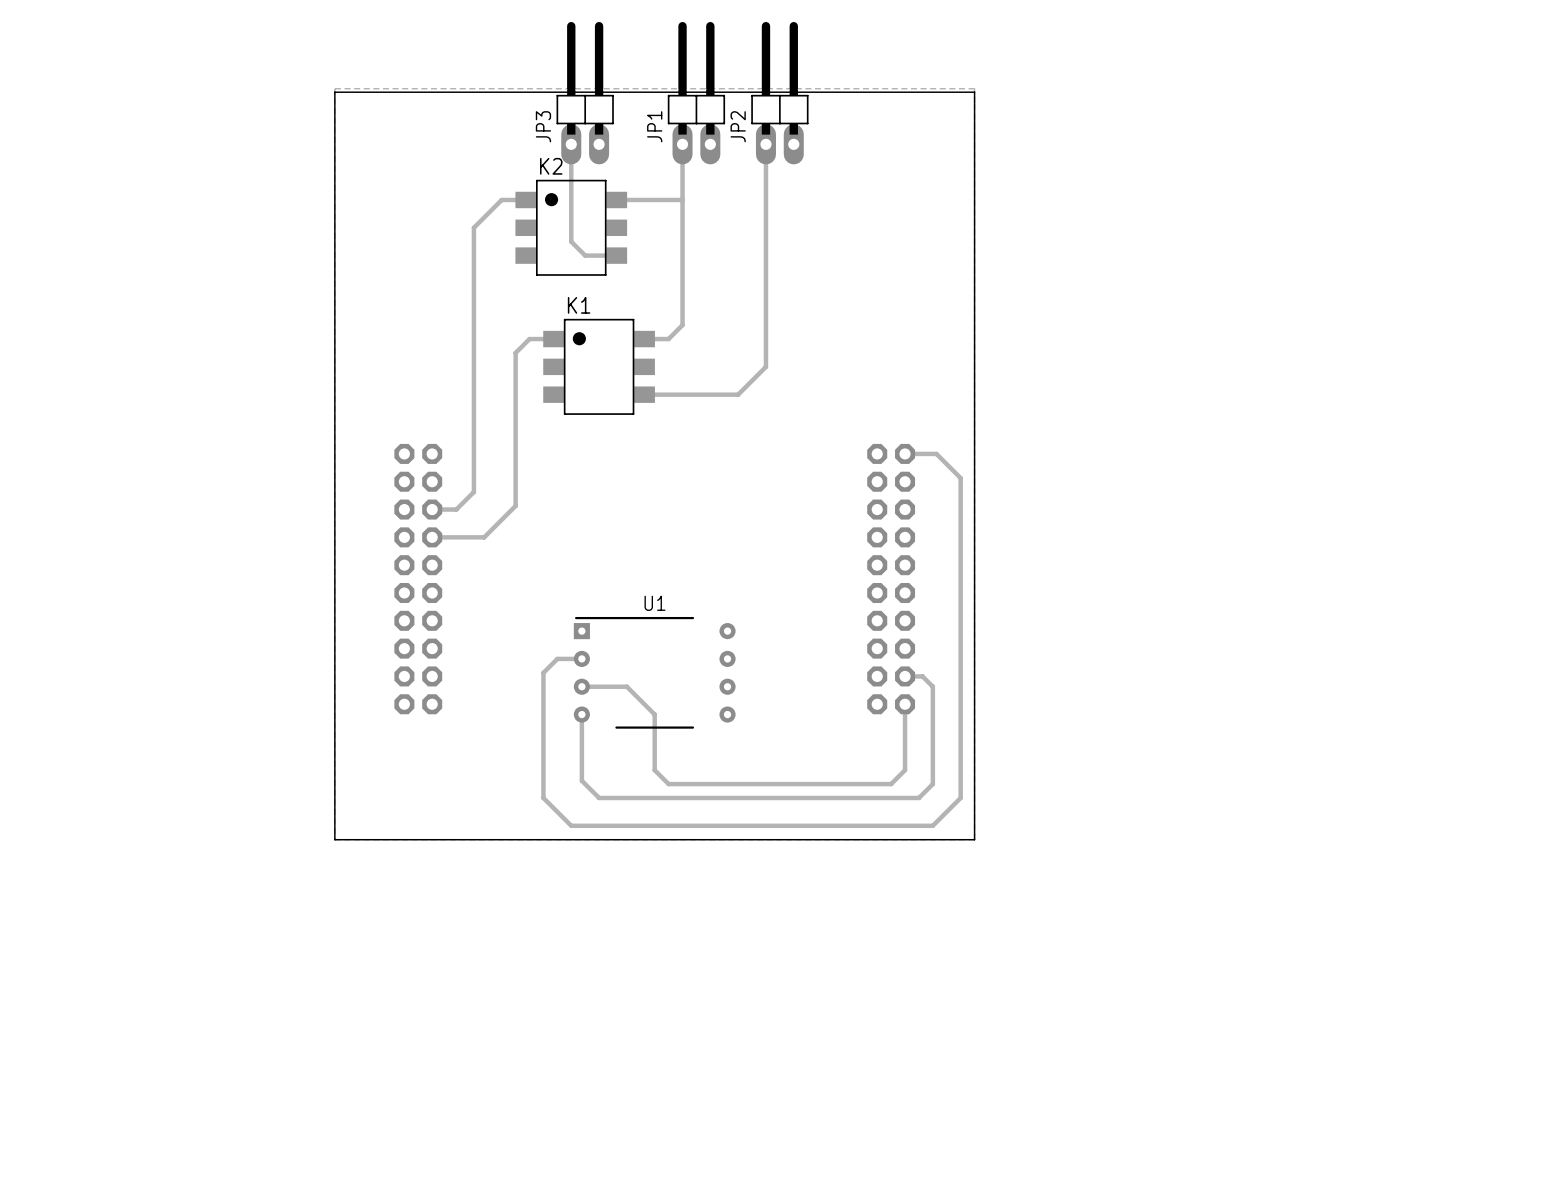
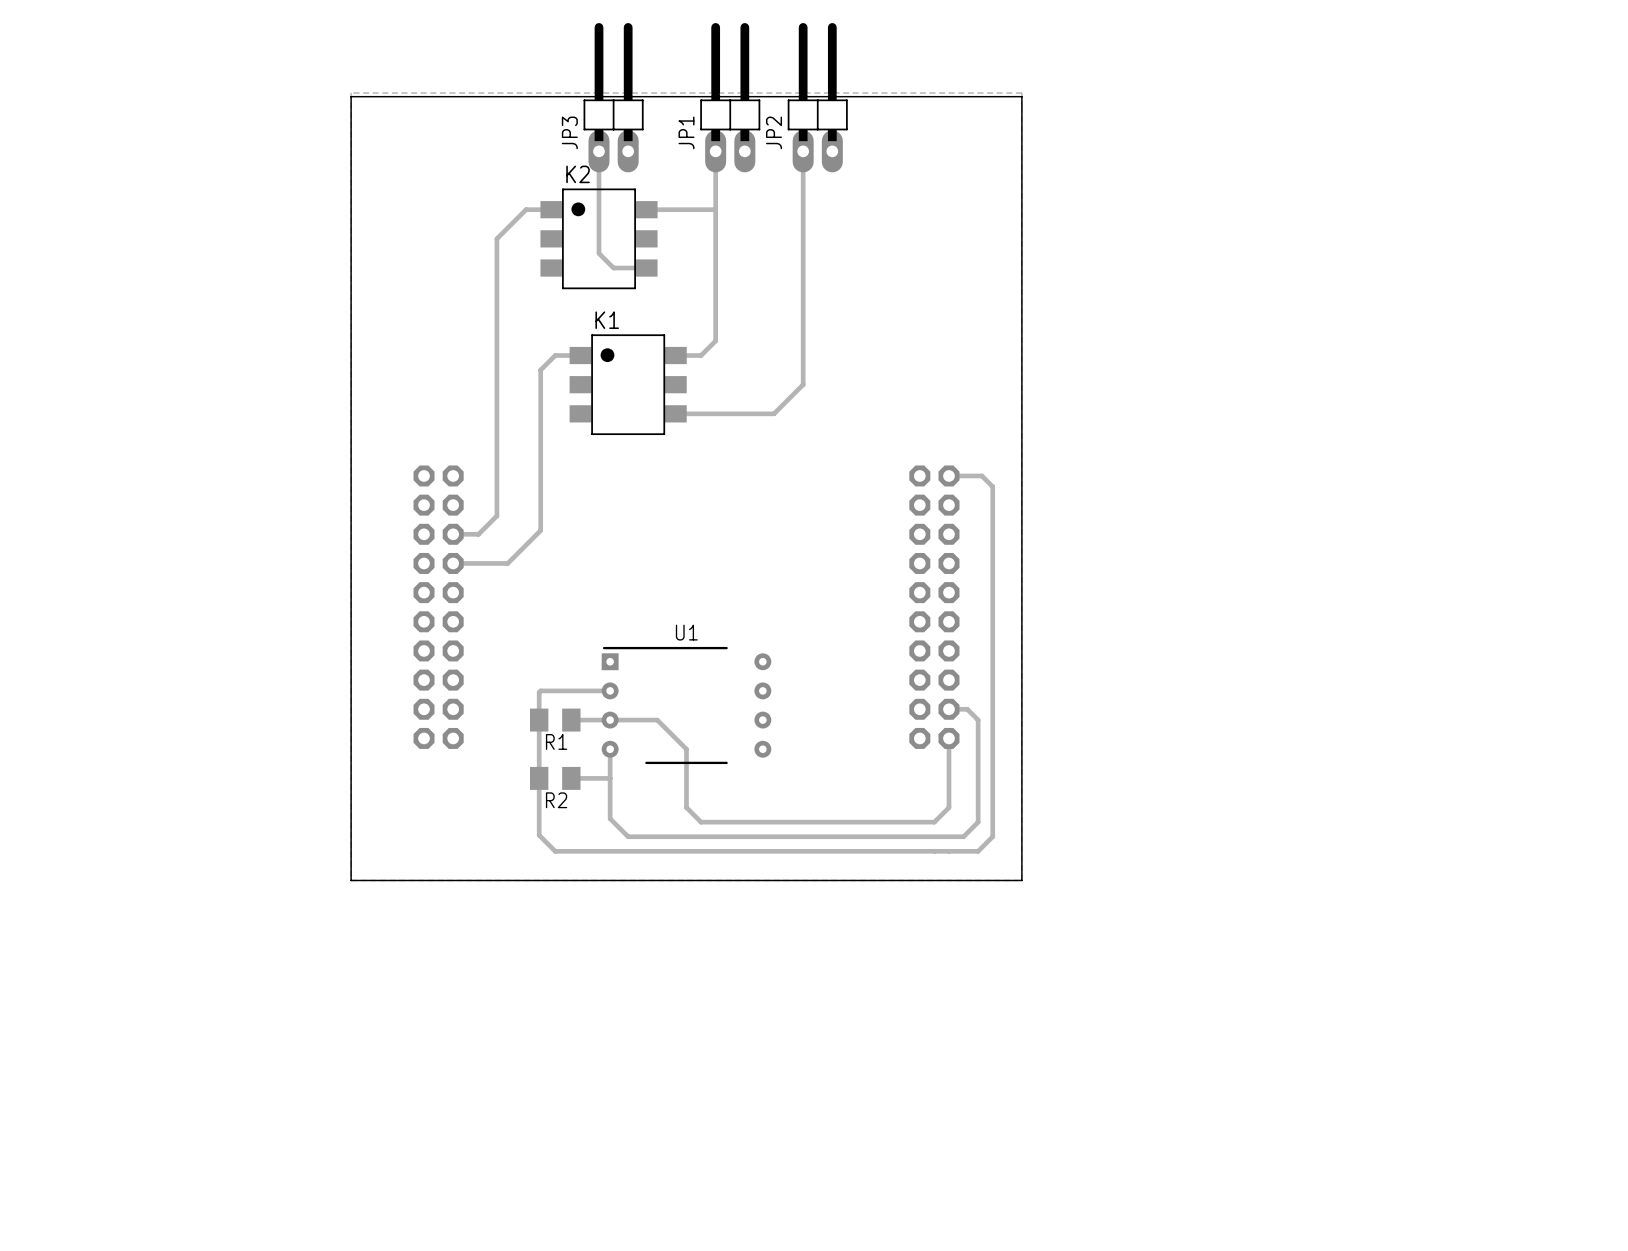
track: (946, 464) (960, 478) (960, 797) (932, 825) (571, 825) (543, 797) (543, 672) (557, 658) -> (992, 486) (992, 836) (978, 851) (555, 851) (539, 835) (539, 692) (584, 690)
R1: none -> (555, 720)
track: none -> (610, 720) (571, 720)
R2: none -> (555, 778)
track: none -> (610, 778) (571, 778)

